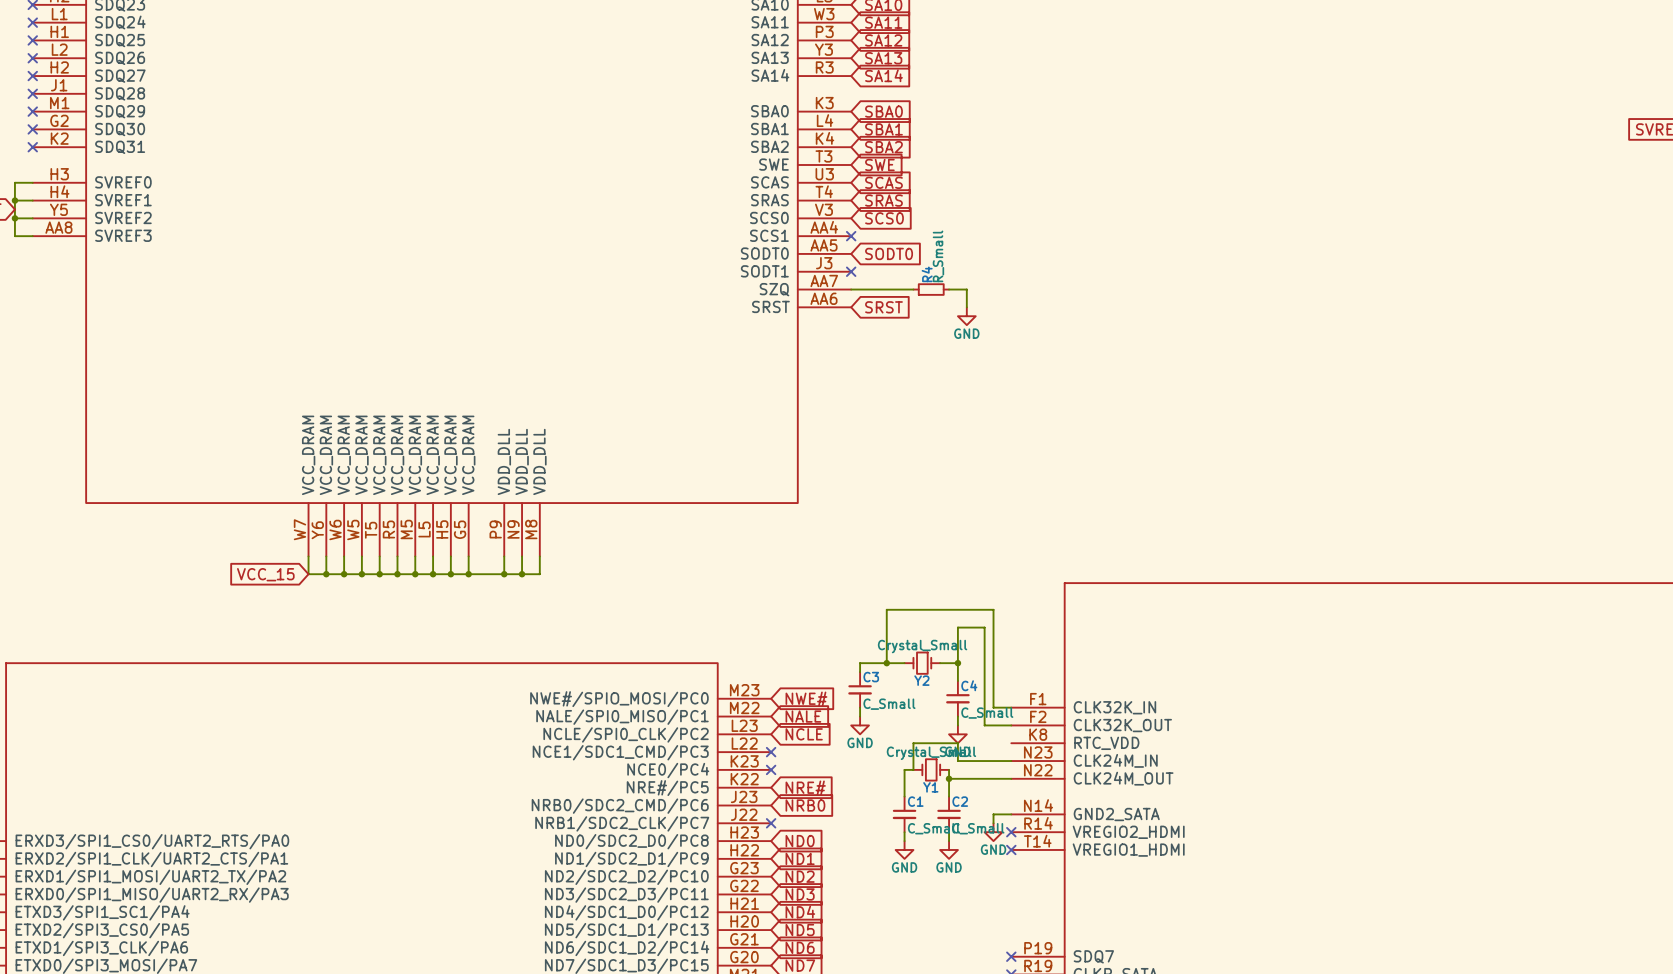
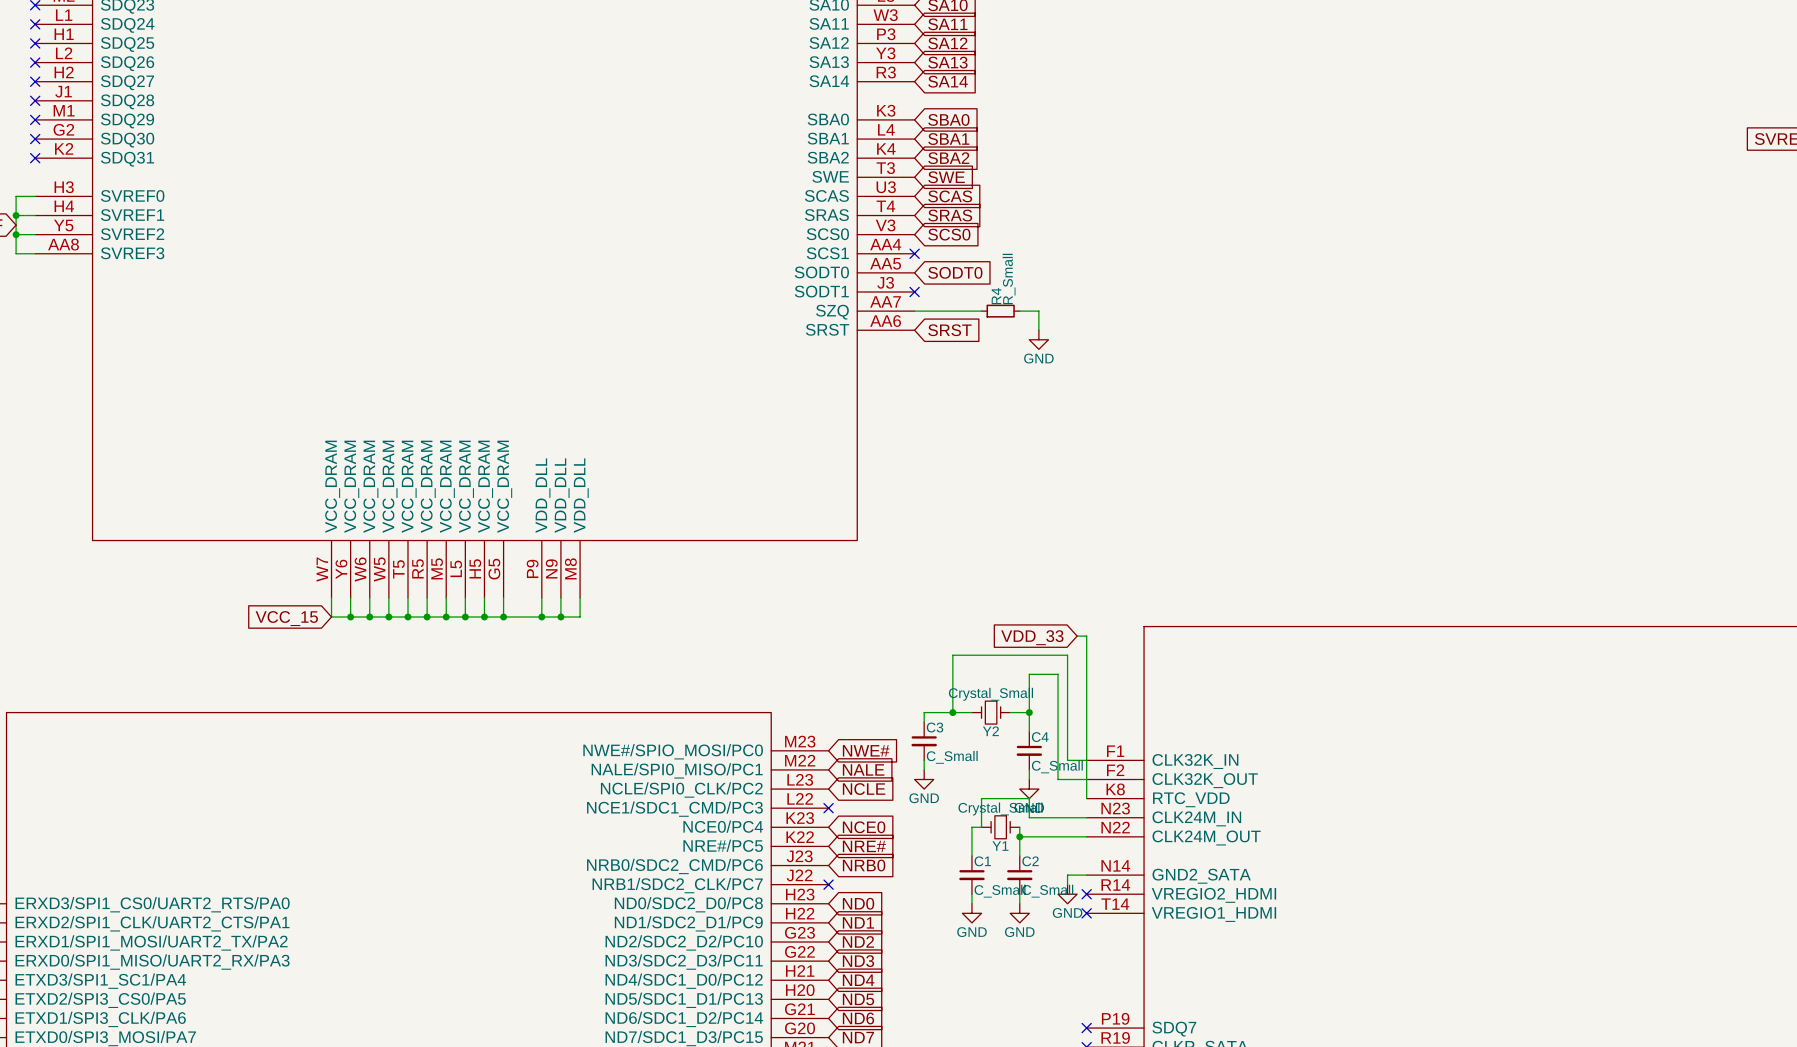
global label: none -> VDD_33 (1032, 637)
wire: none -> (1077, 636) (1086, 636) (1086, 798)
no-connect mark: (771, 769) -> none
global label: none -> NCE0 (864, 827)

